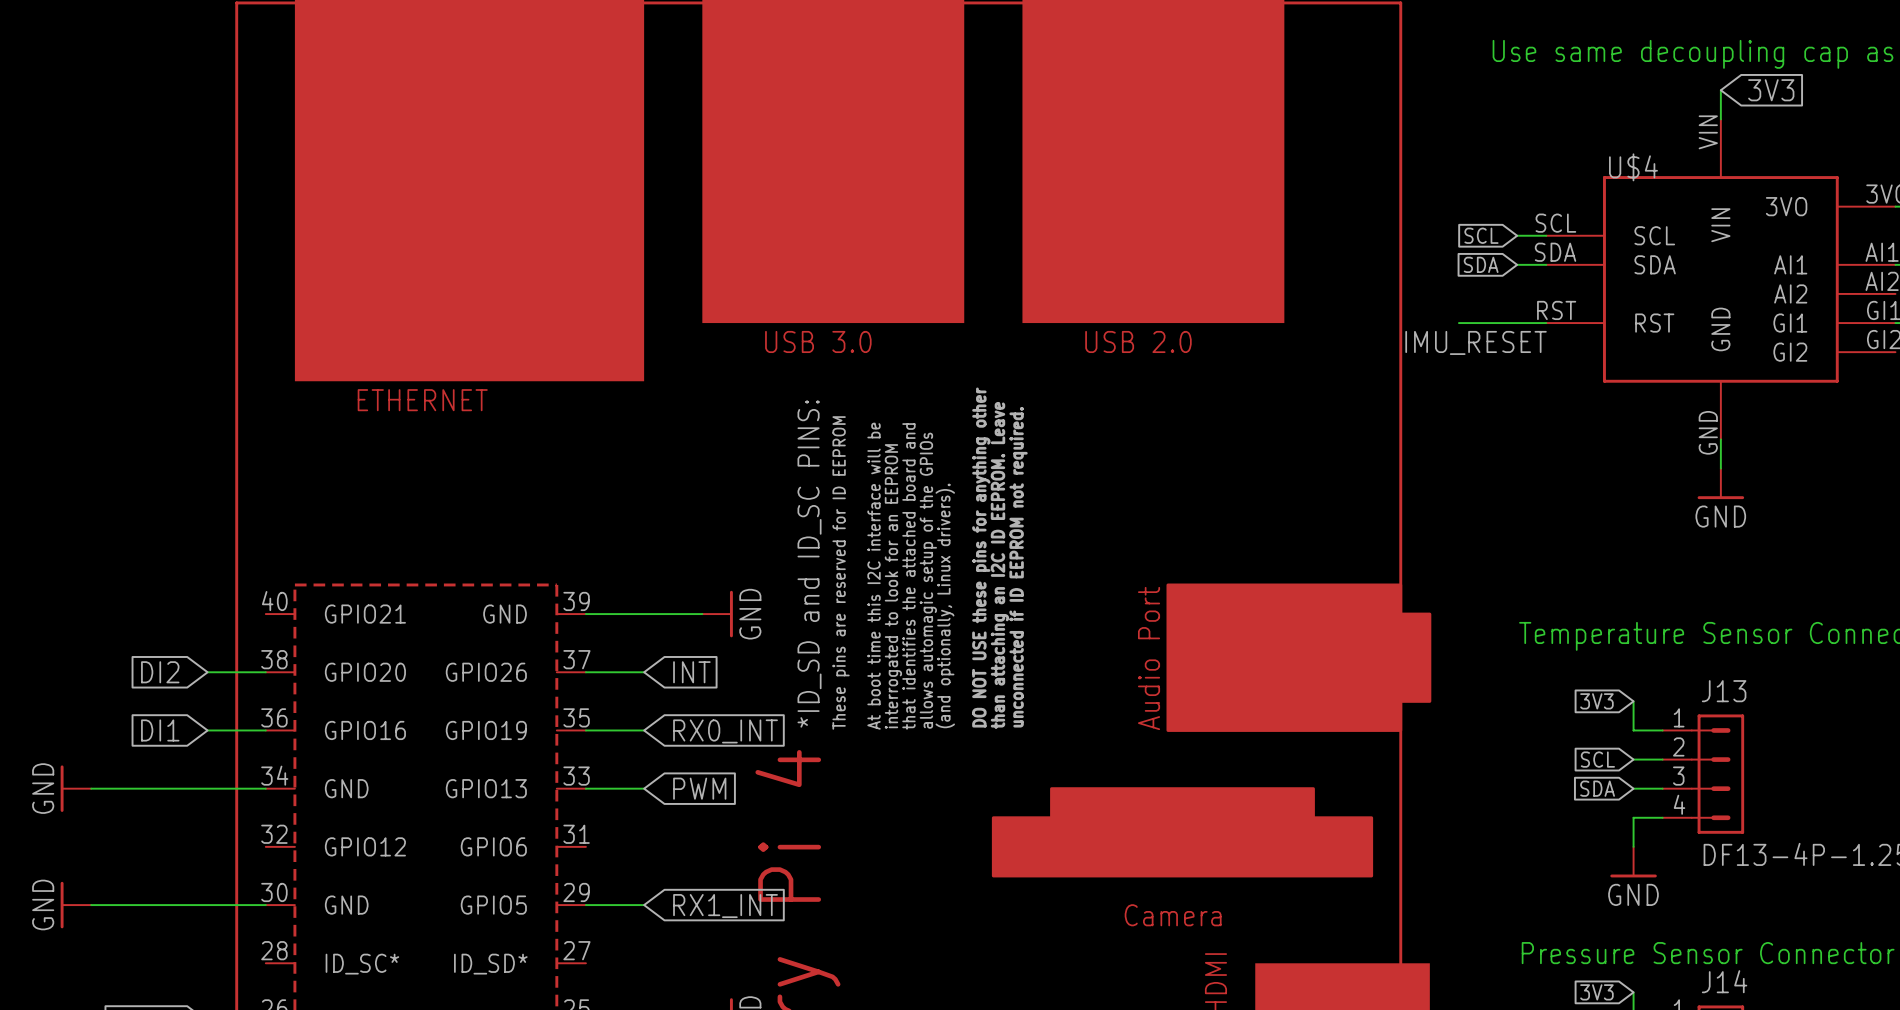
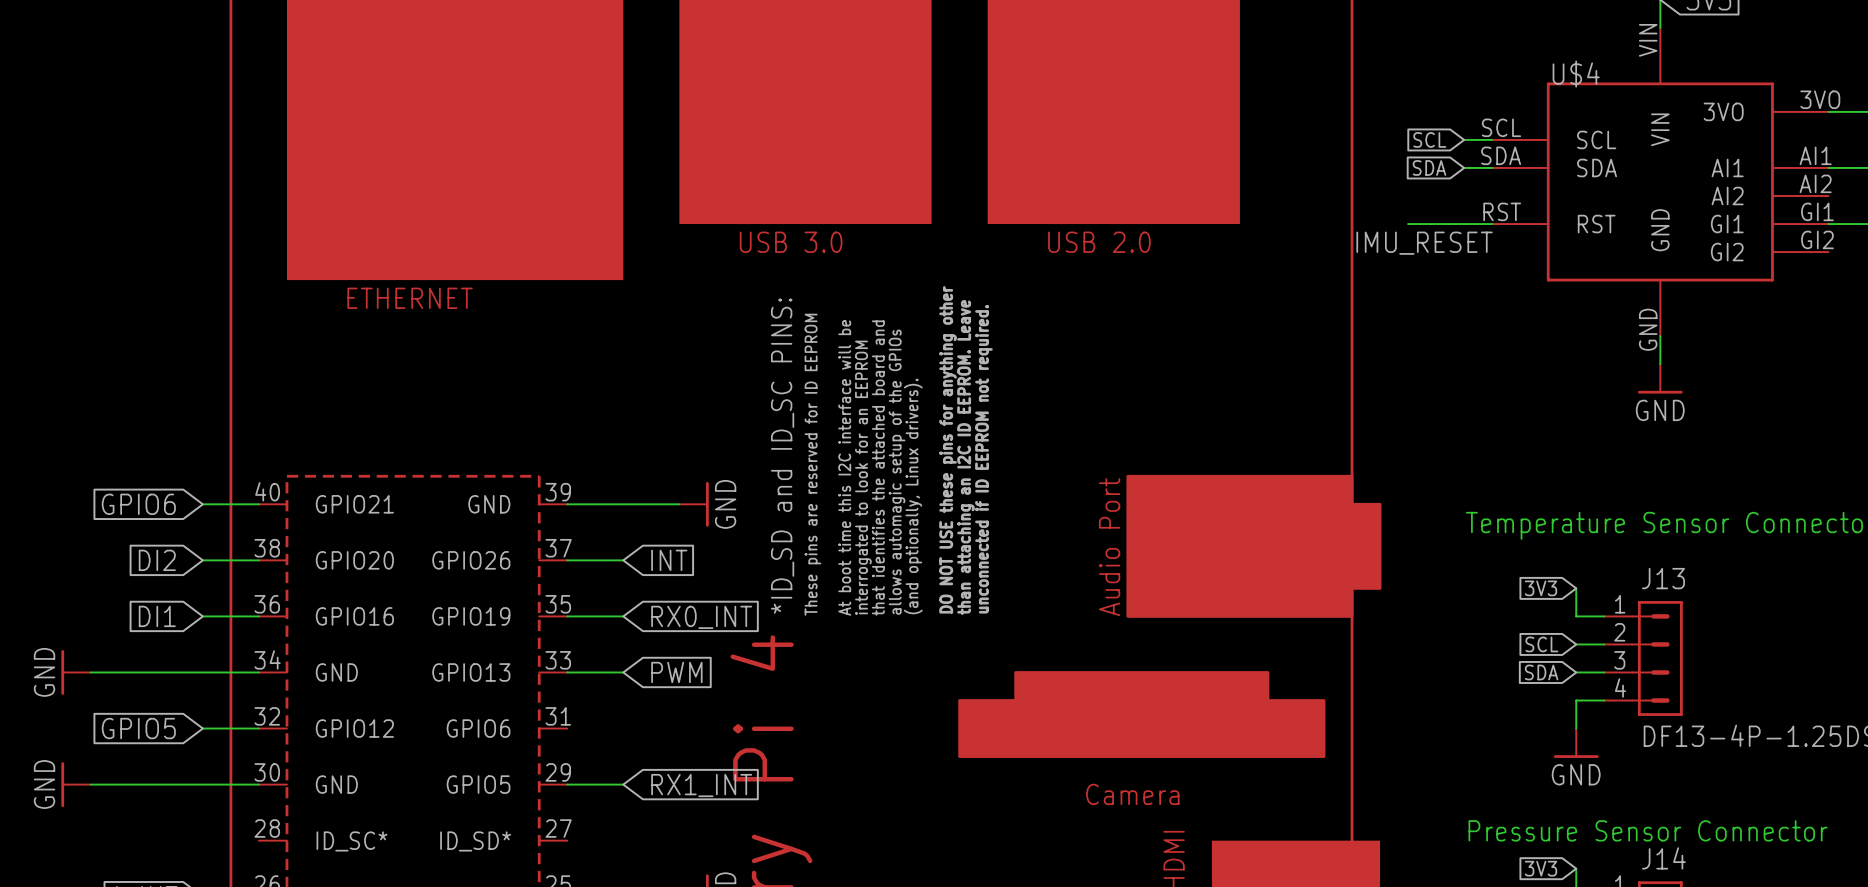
global label: none -> GPIO6 (138, 504)
wire: none -> (202, 504) (258, 504)
global label: none -> GPIO5 (138, 728)
wire: none -> (202, 728) (258, 728)

